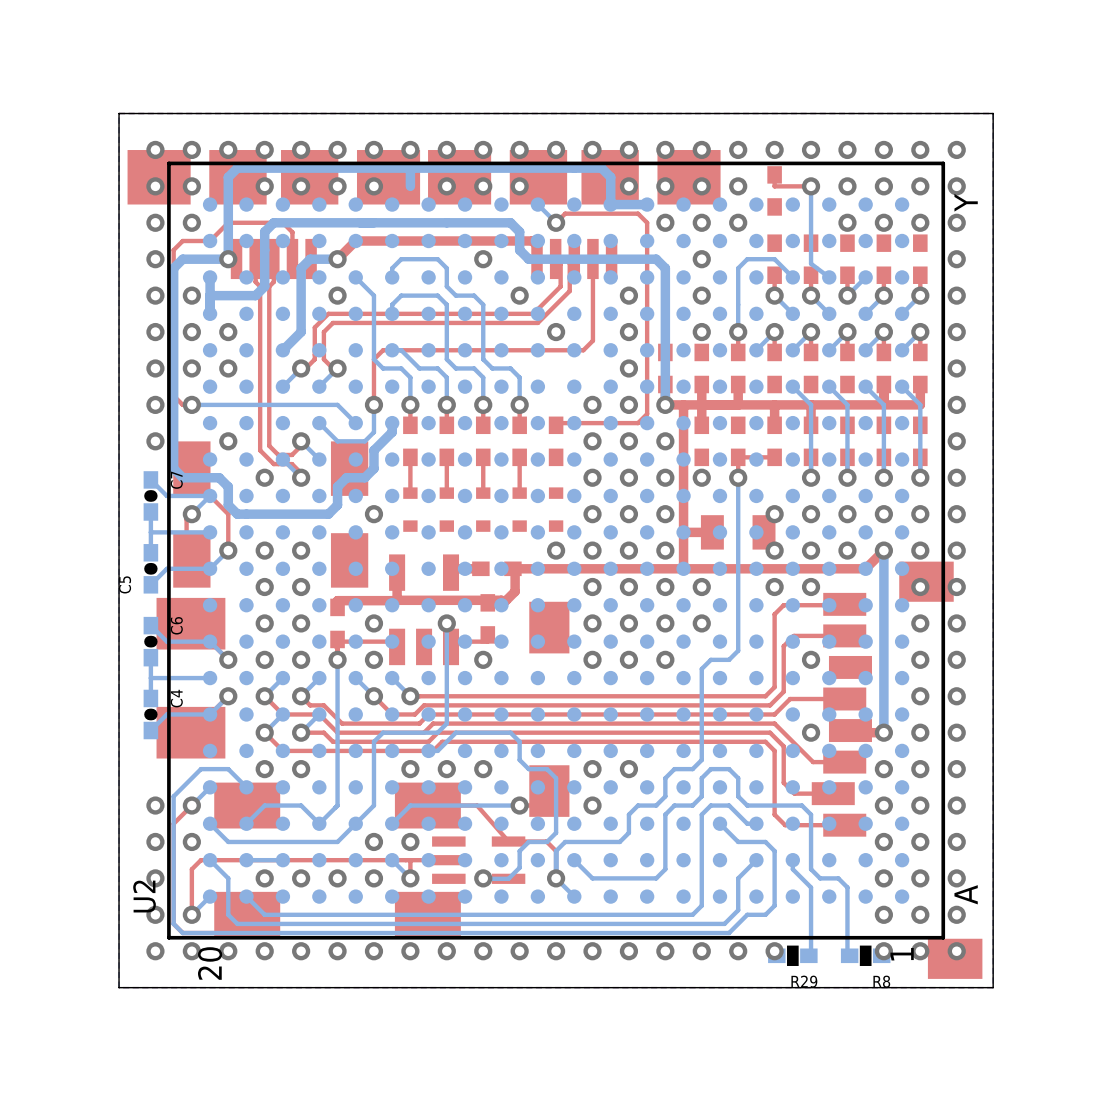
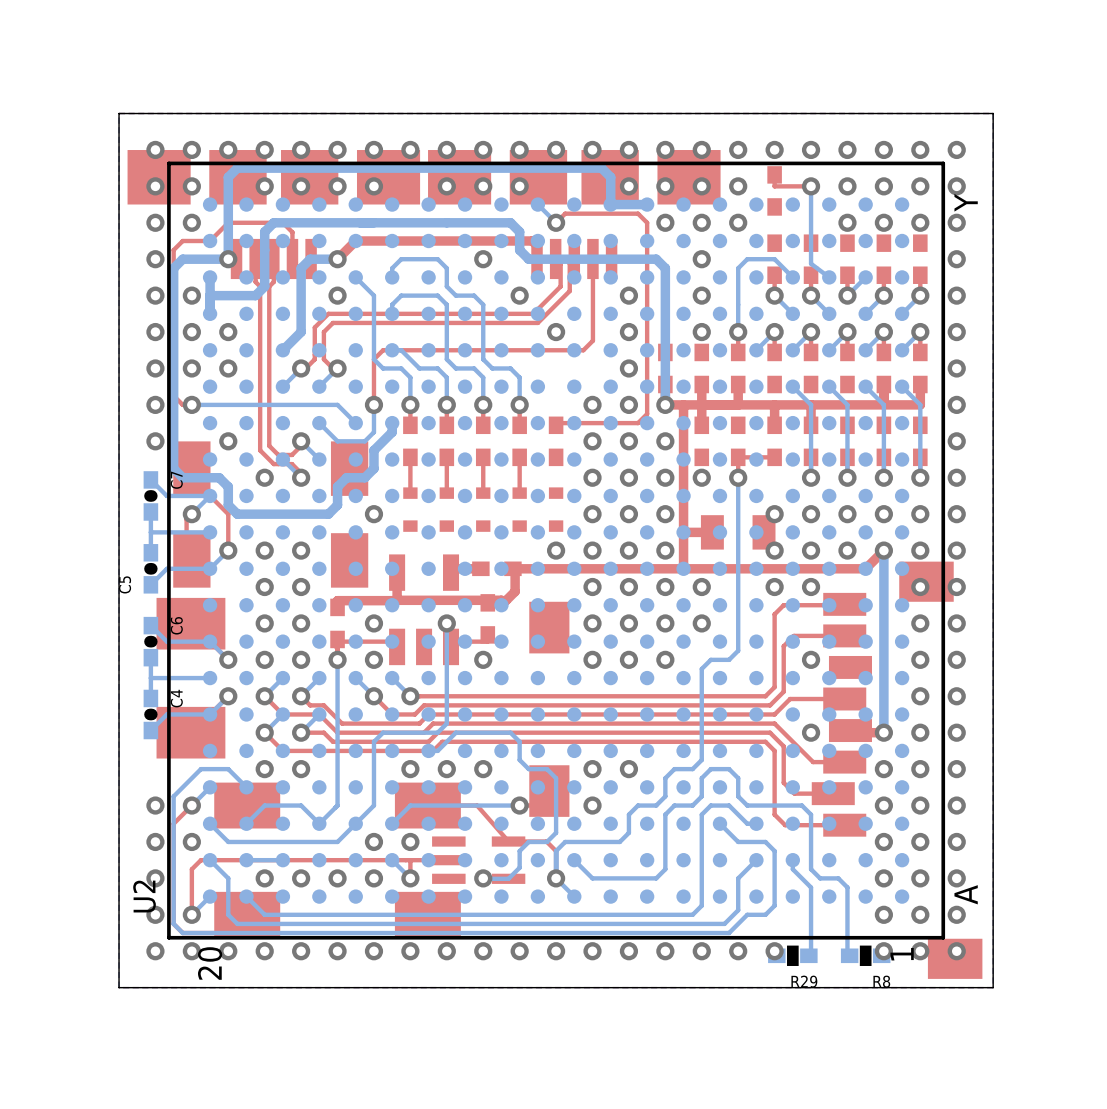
bottom track: (410, 168) (410, 186) -> none

